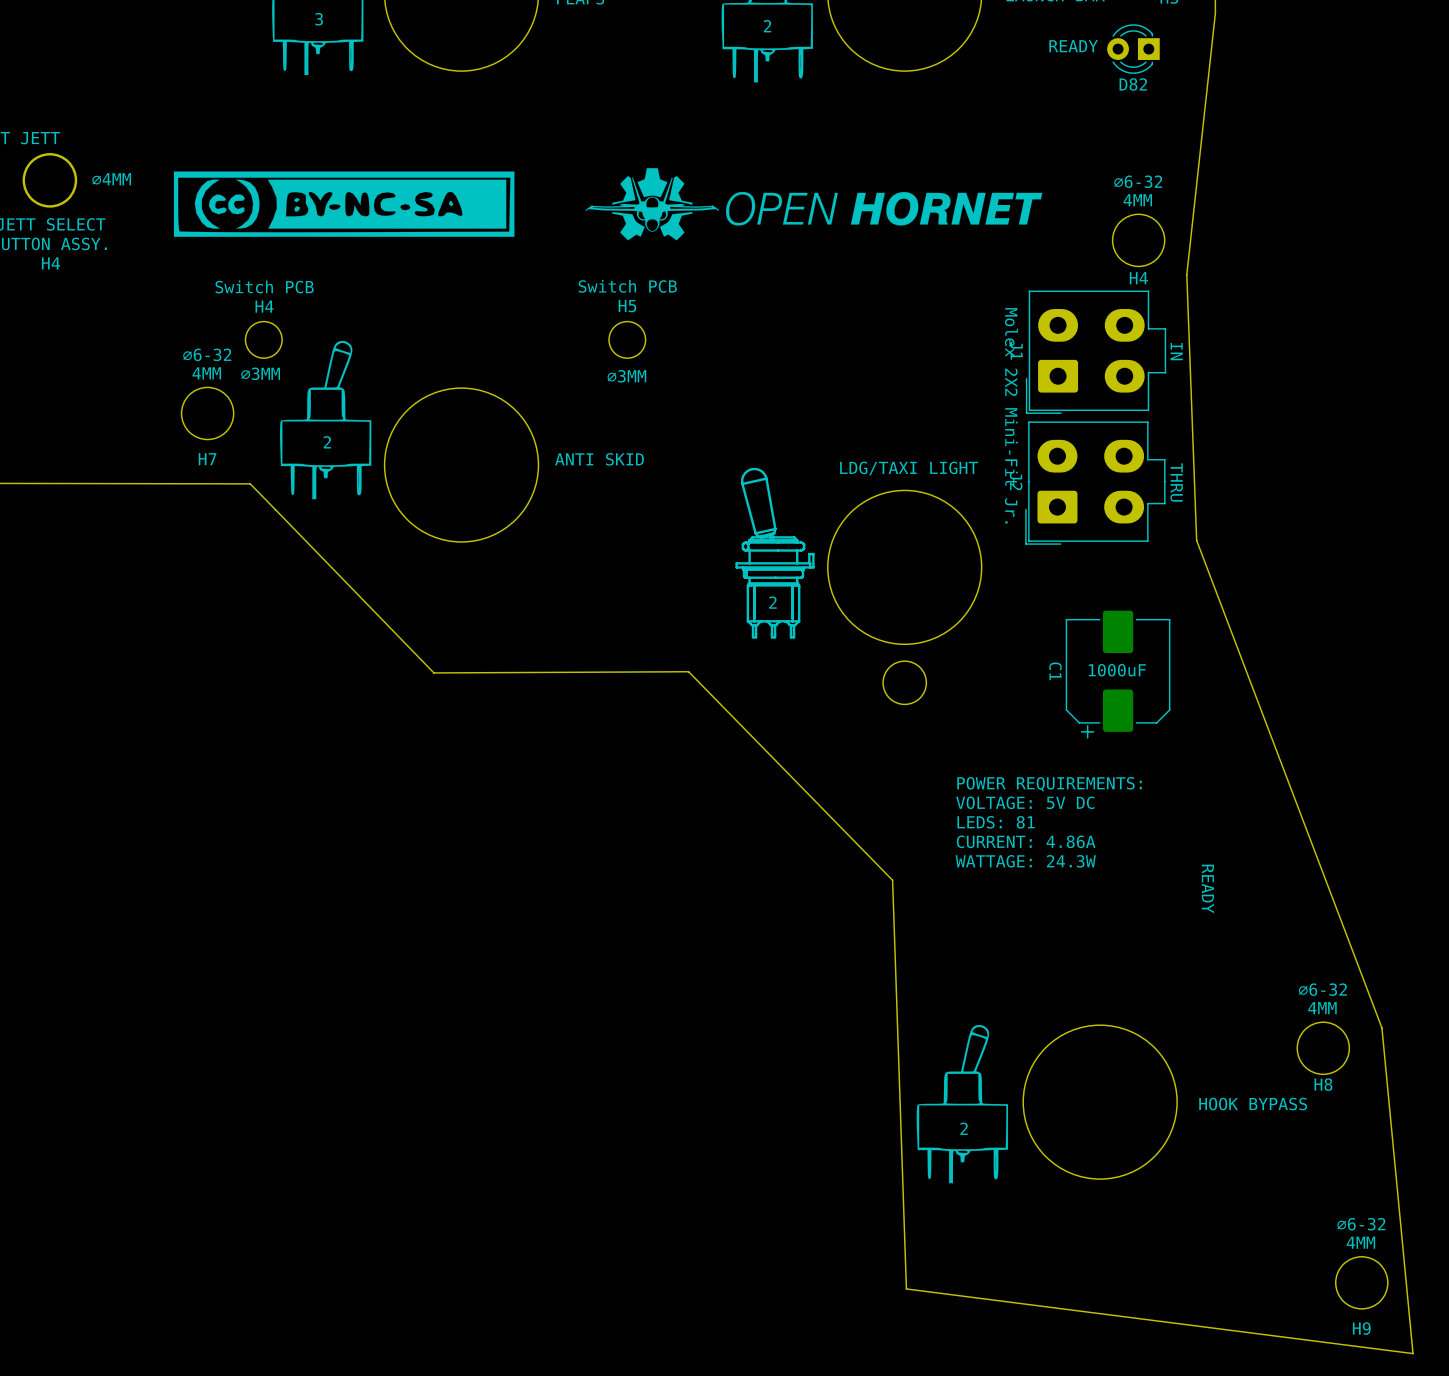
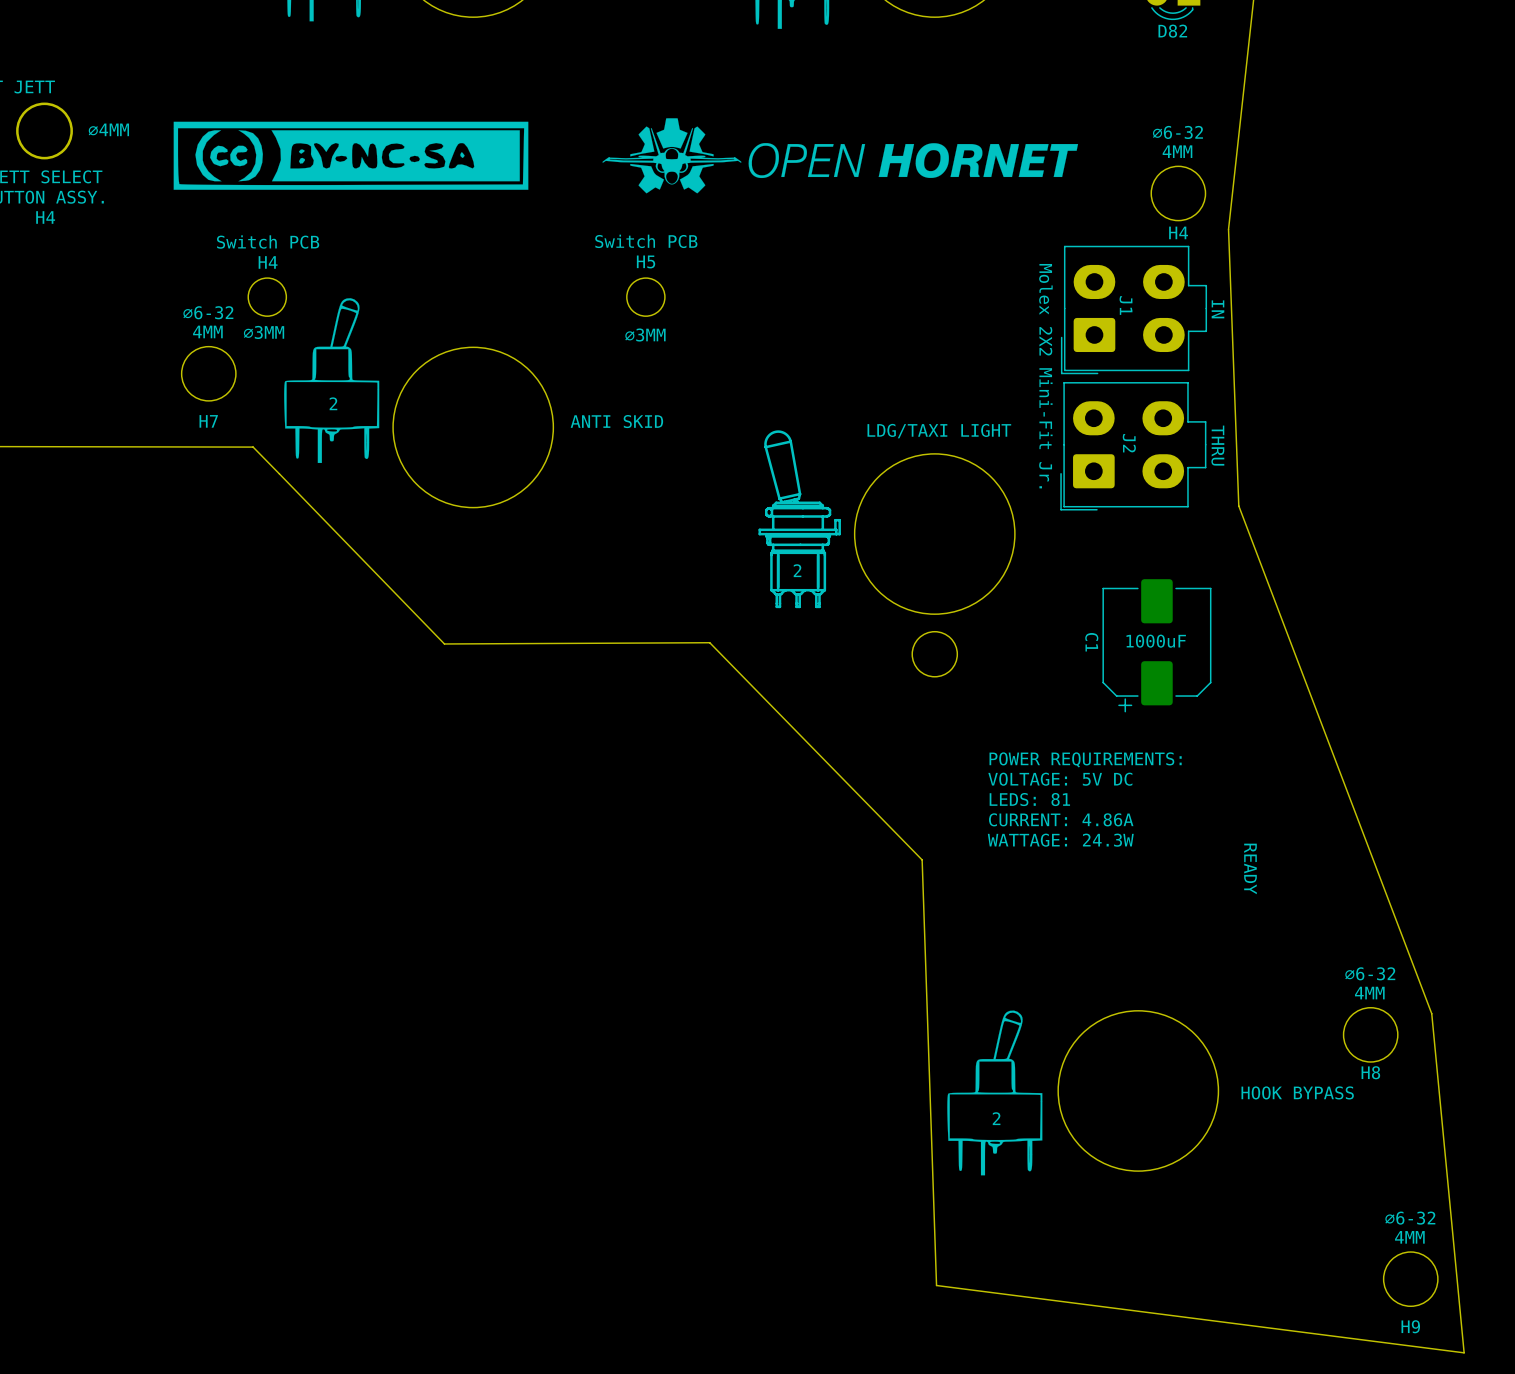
J1 name position: J1 (1016, 350) -> J1 (1126, 305)
J2 name position: J2 (1016, 481) -> J2 (1129, 443)

